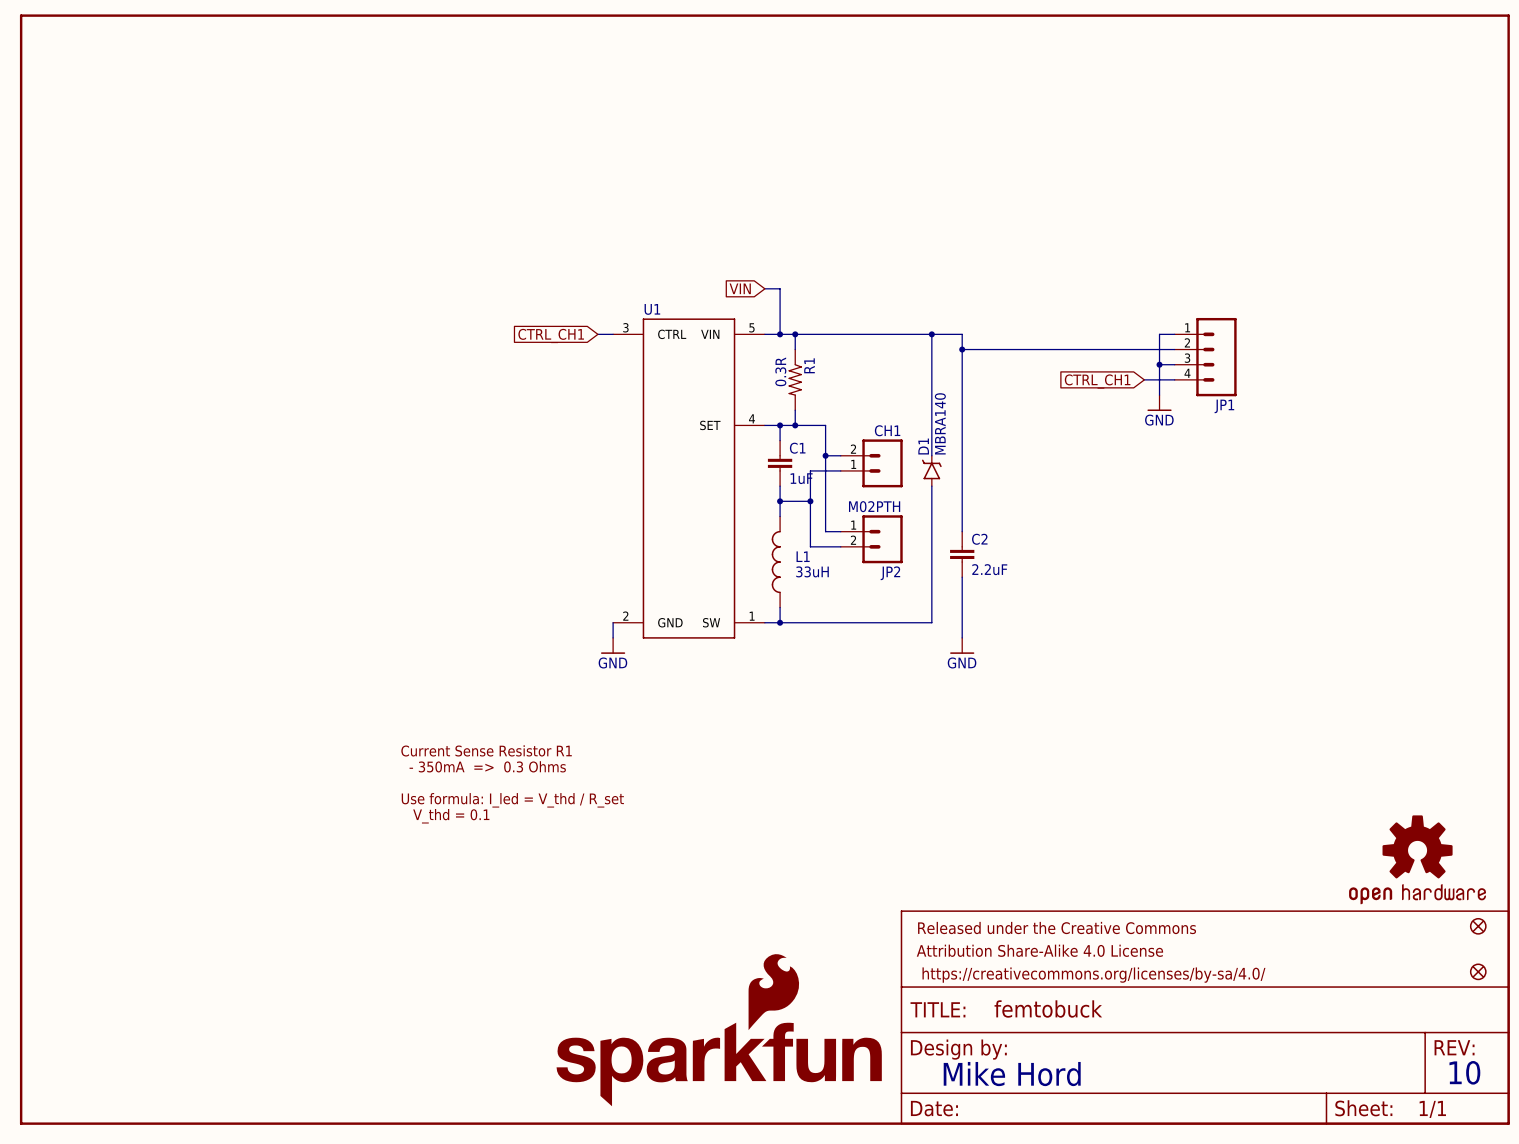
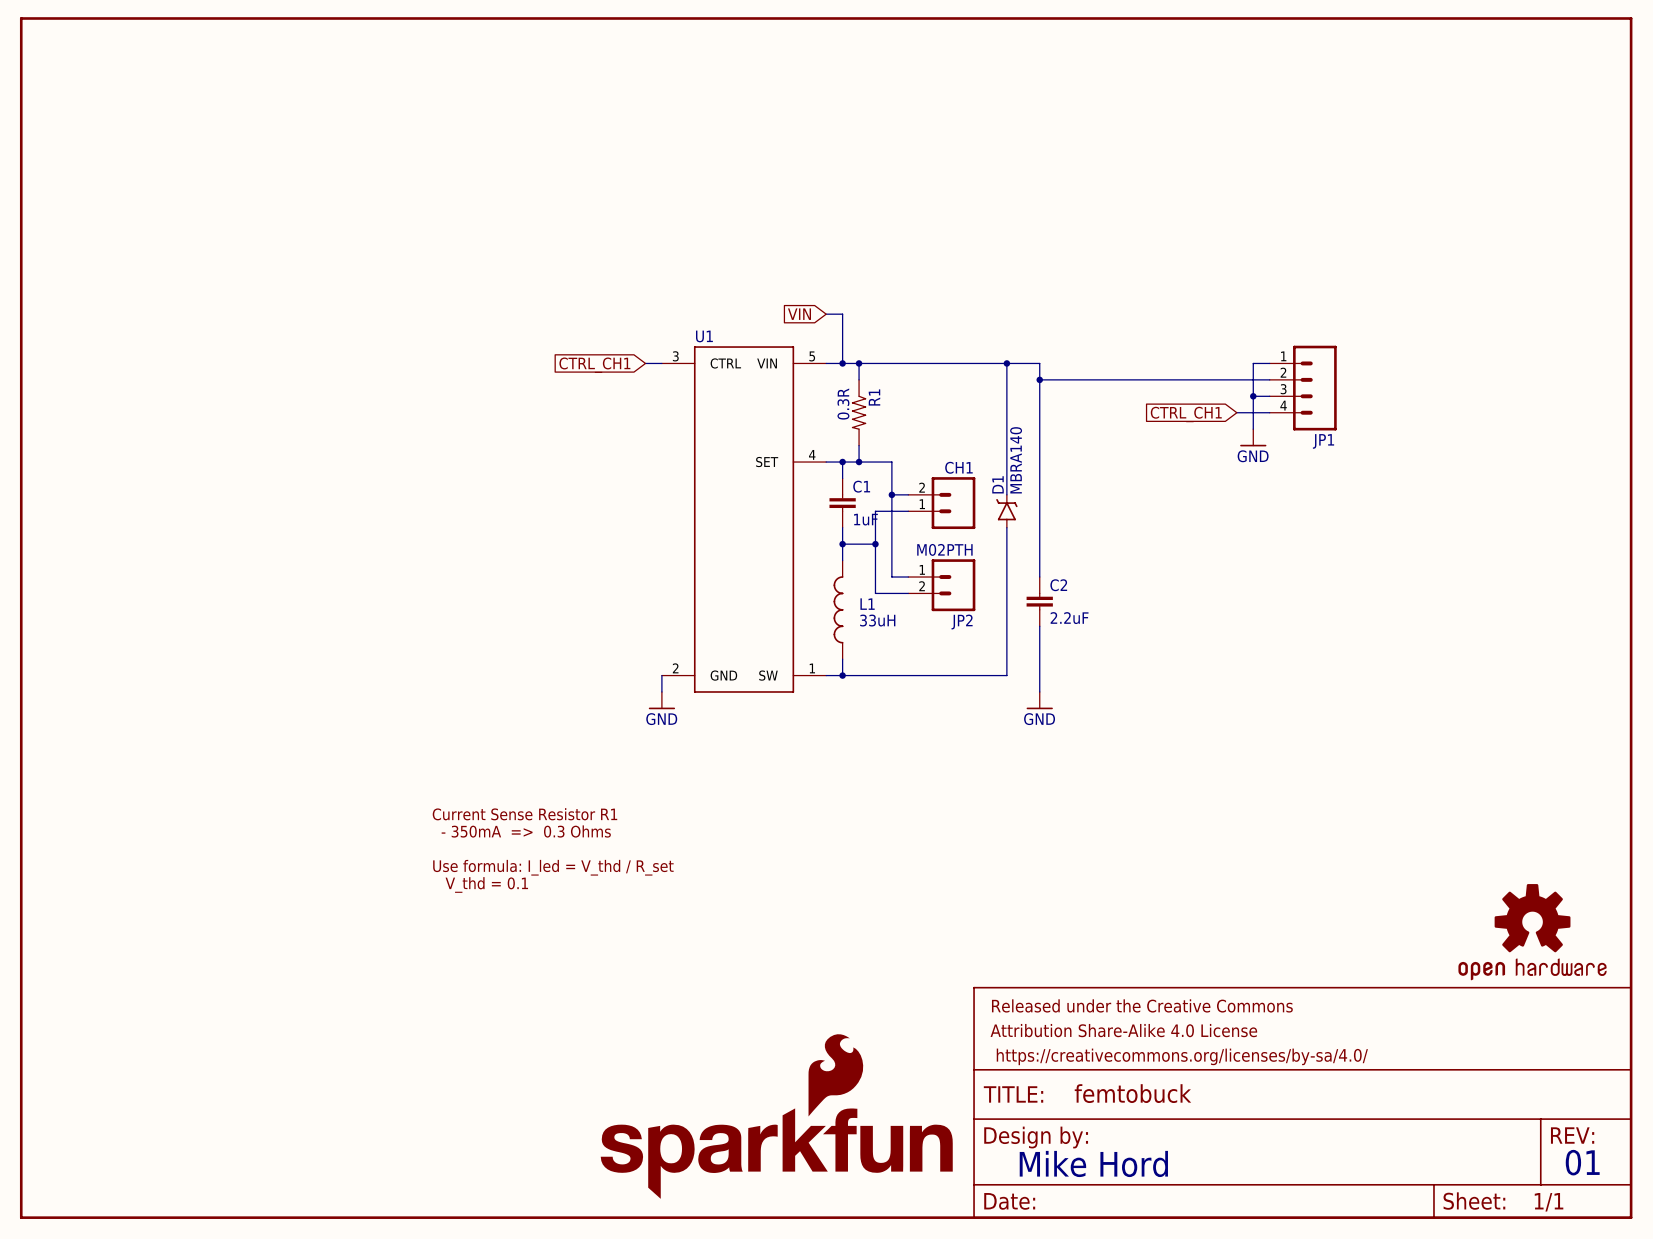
part: (1478, 926) -> none
part: (1478, 971) -> none
text: 10 (1464, 1072) -> 01 (1582, 1162)

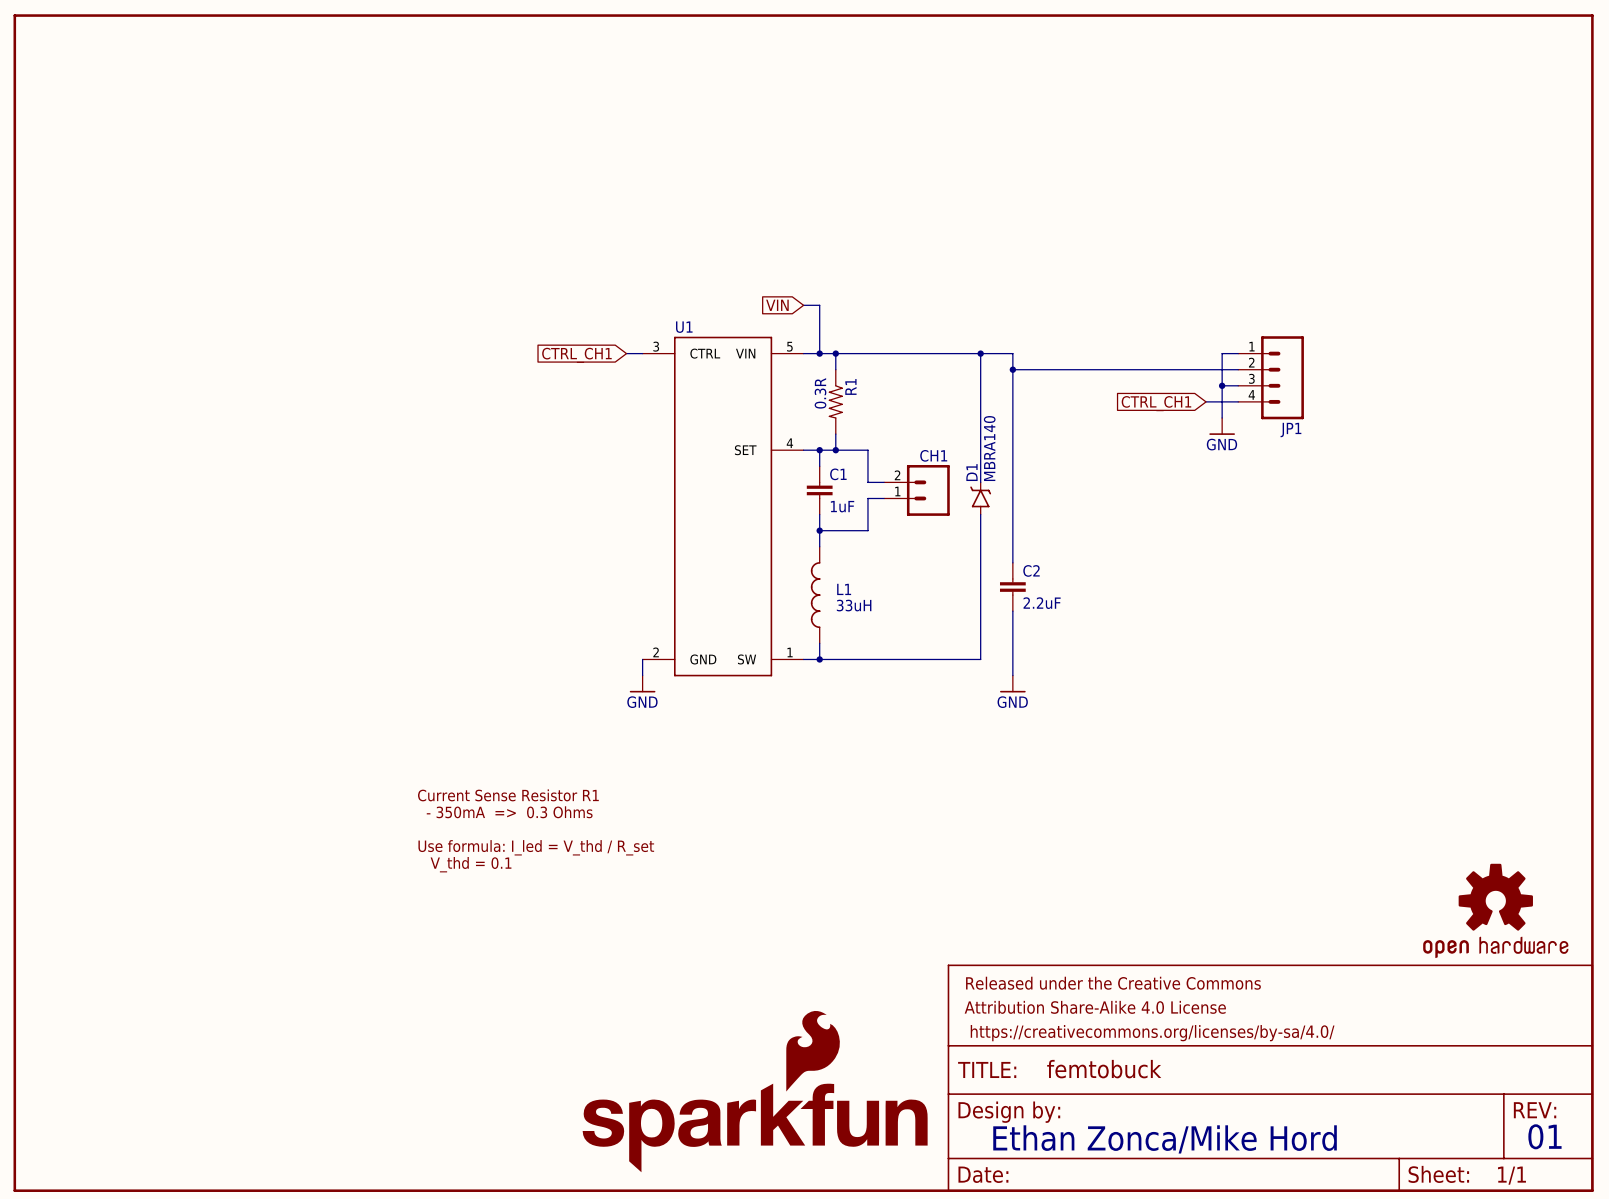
wire: (891, 494) (891, 511) (875, 511) (875, 593) (908, 593) -> none
junction: (891, 494) -> none
junction: (875, 544) -> none
wire: (891, 544) (891, 577) (908, 577) -> (867, 530) (851, 530)
JP2: M02PTH (941, 585) -> none
text: Mike Hord (1093, 1163) -> Ethan Zonca/Mike Hord (1165, 1139)

